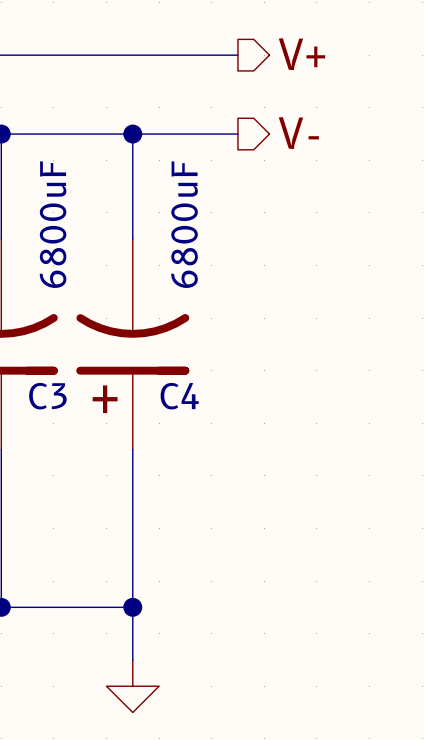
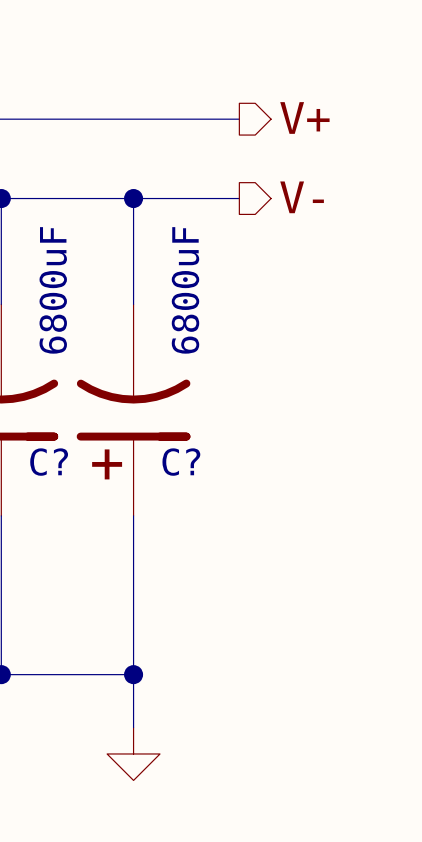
C3 name: C3 (47, 396) -> C? (49, 462)
C4 name: C4 (179, 396) -> C? (181, 462)

